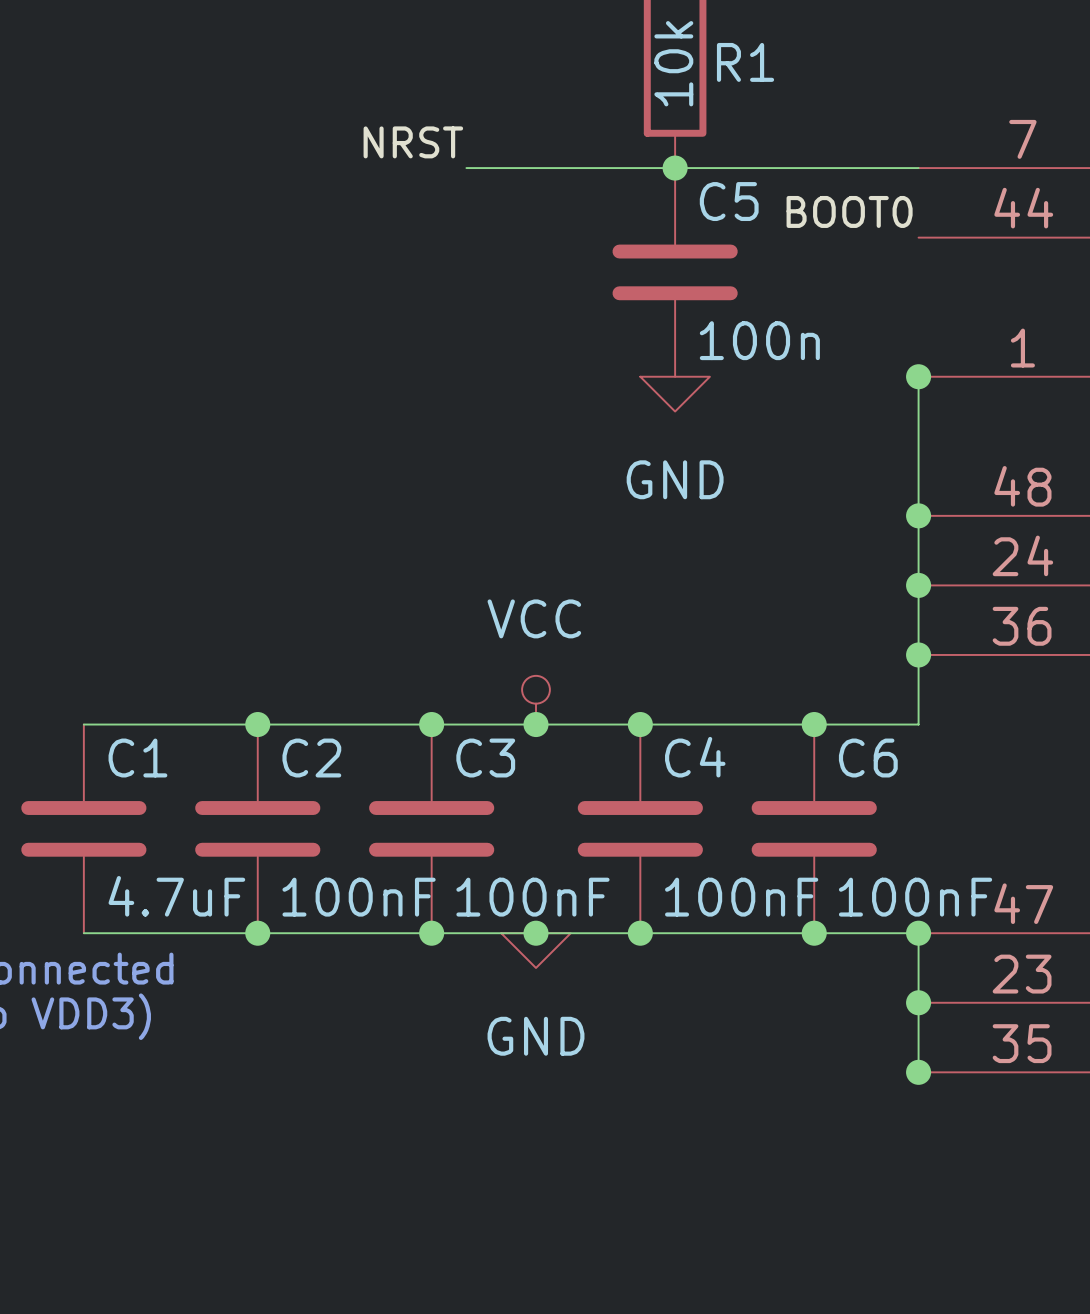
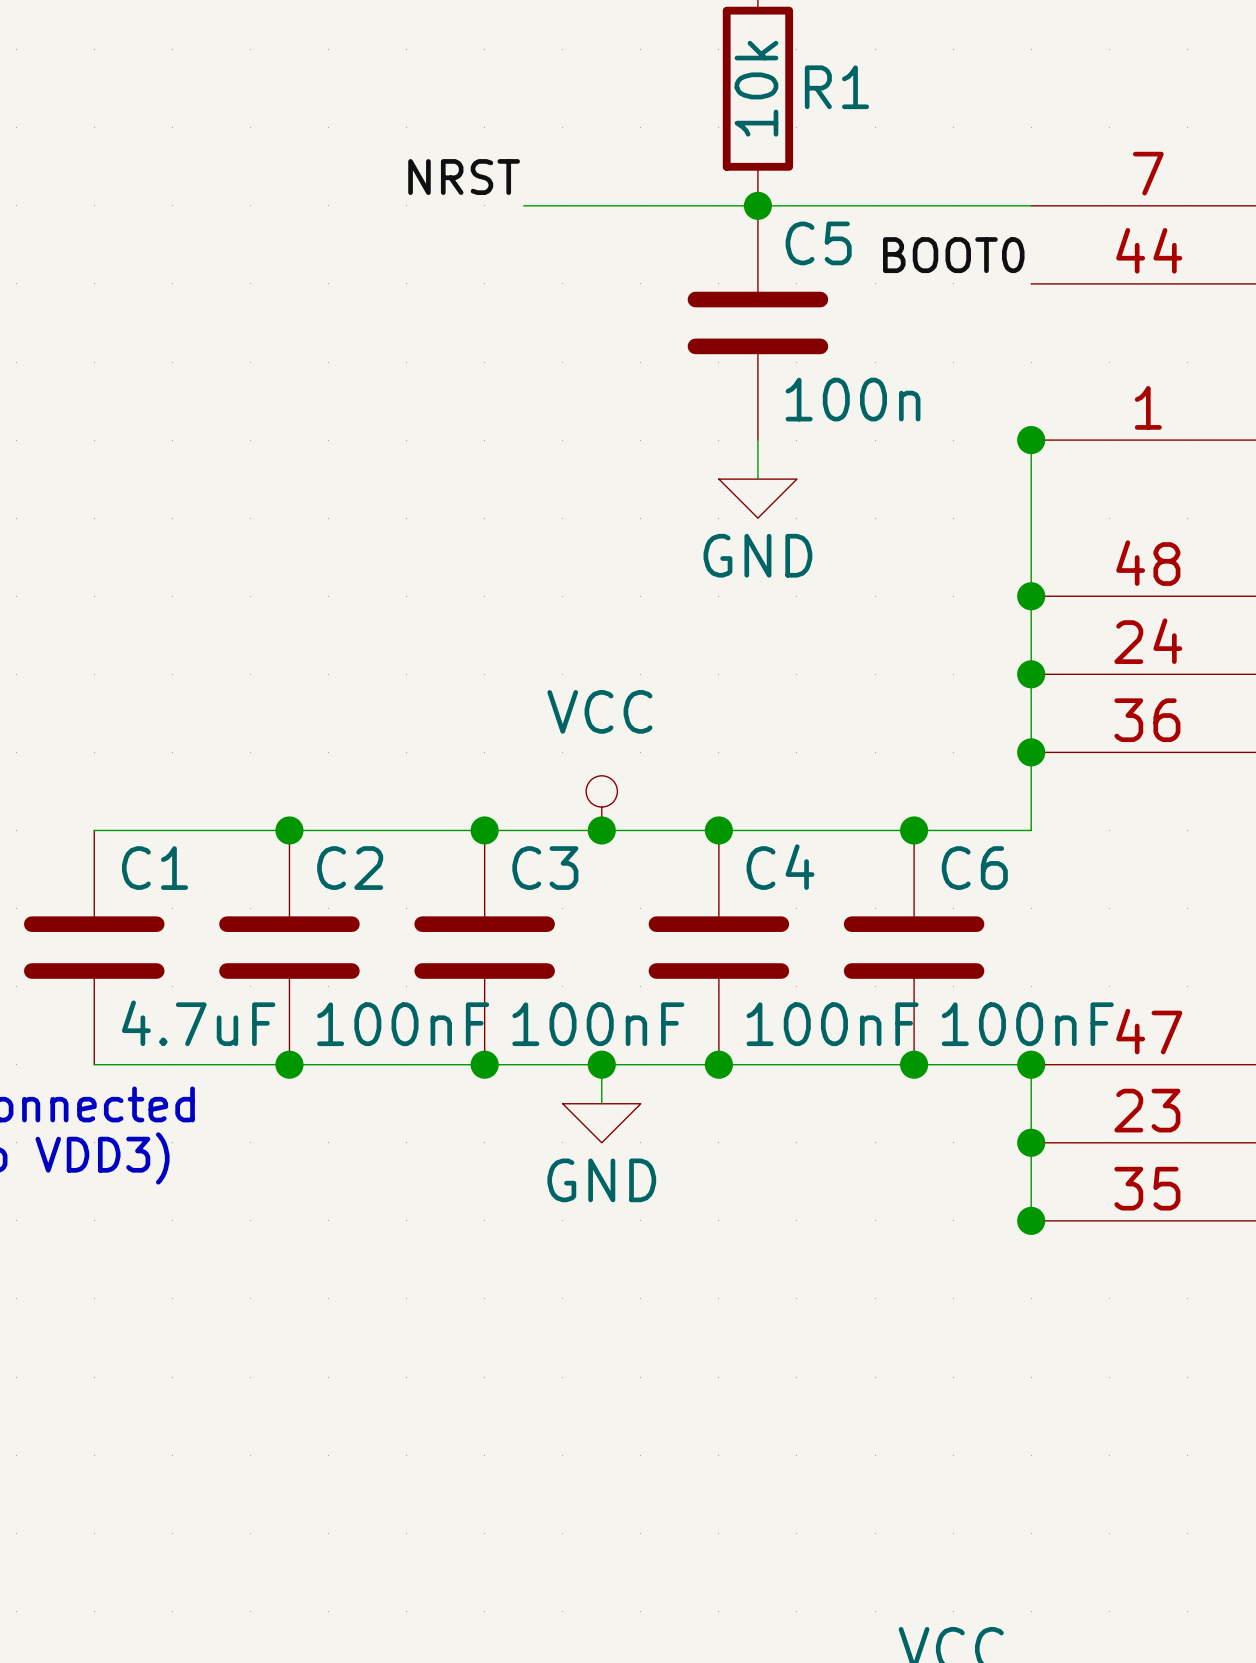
wire: none -> (757, 440) (757, 479)
power symbol position: GND (675, 394) -> GND (757, 498)
wire: none -> (601, 1064) (601, 1103)
power symbol position: GND (536, 950) -> GND (601, 1123)

